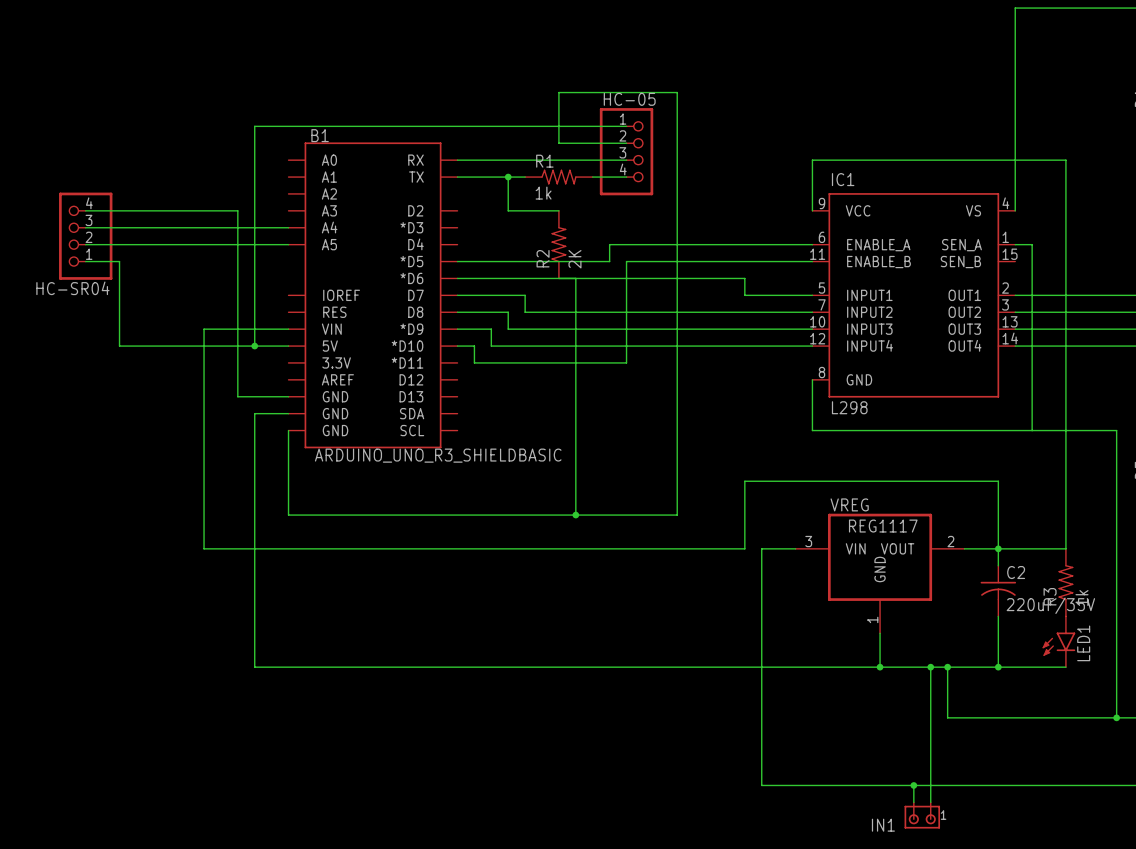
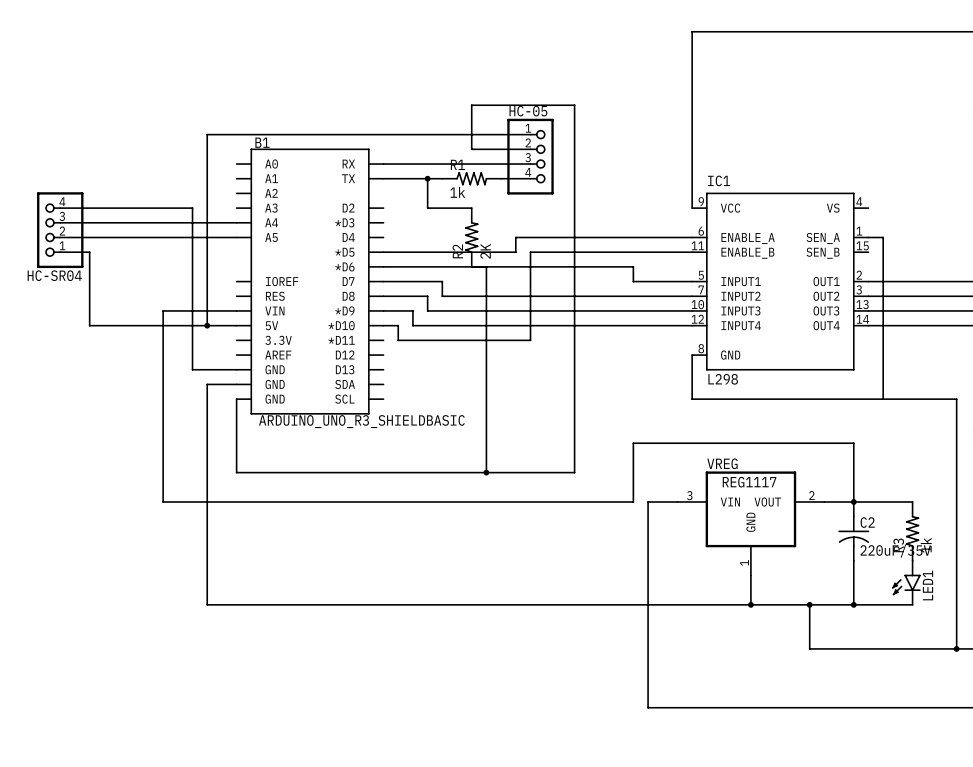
wire: (1015, 8) (1015, 210) -> (868, 31) (692, 31) (692, 164)
wire: (812, 160) (1065, 160) (1065, 548) -> none
wire: (930, 667) (930, 802) -> none
junction: (930, 667) -> none
wire: (913, 785) (913, 802) -> none
junction: (913, 785) -> none
IN1: (922, 815) -> none

